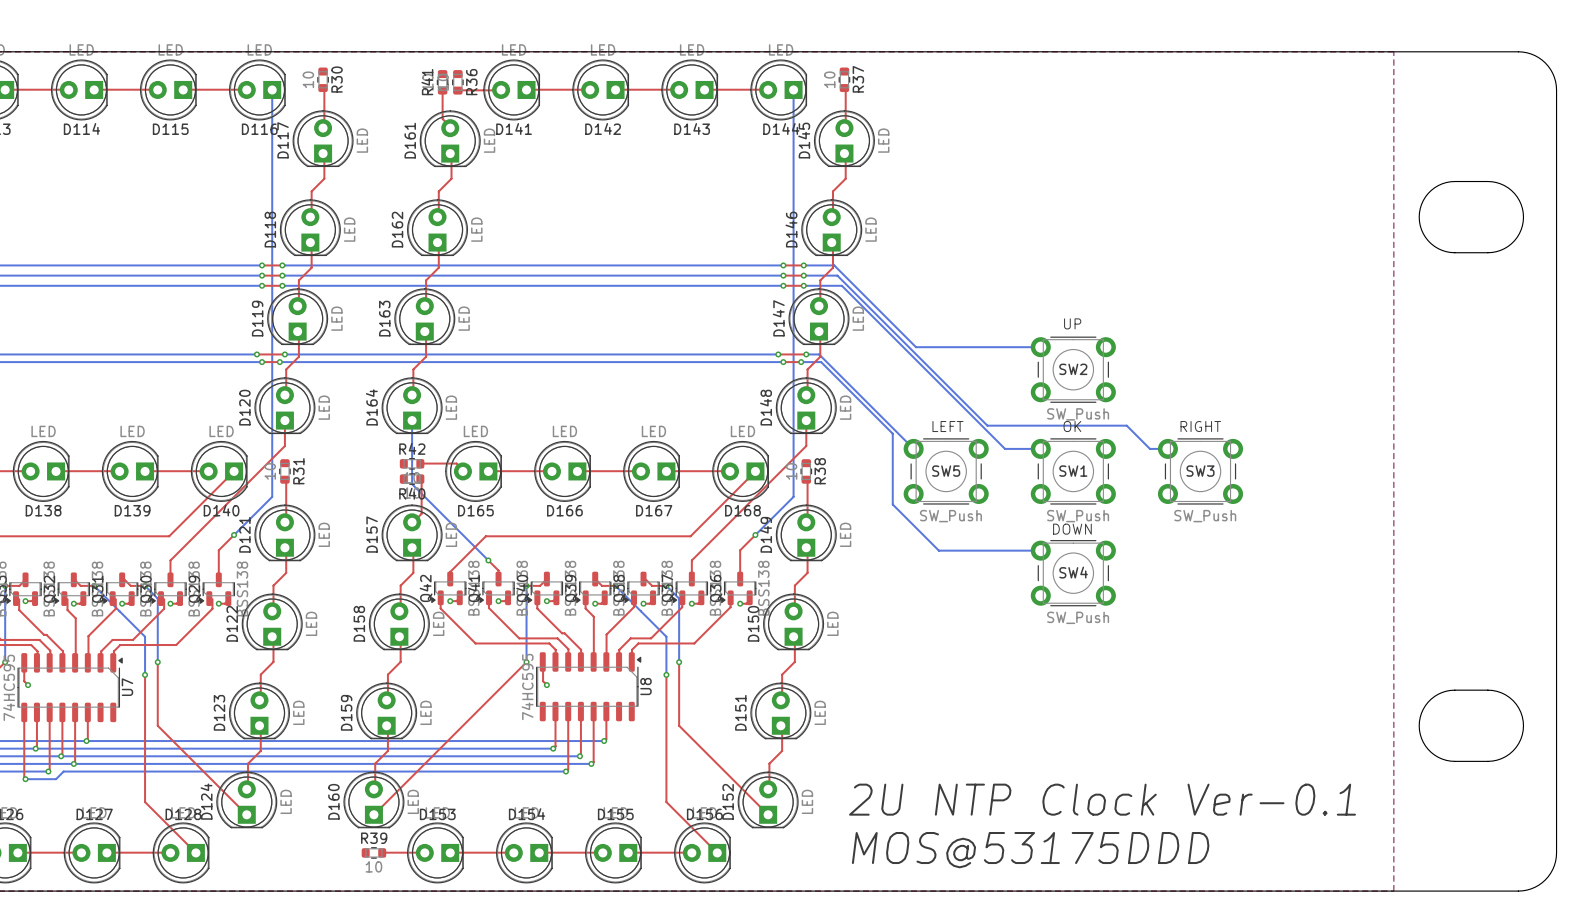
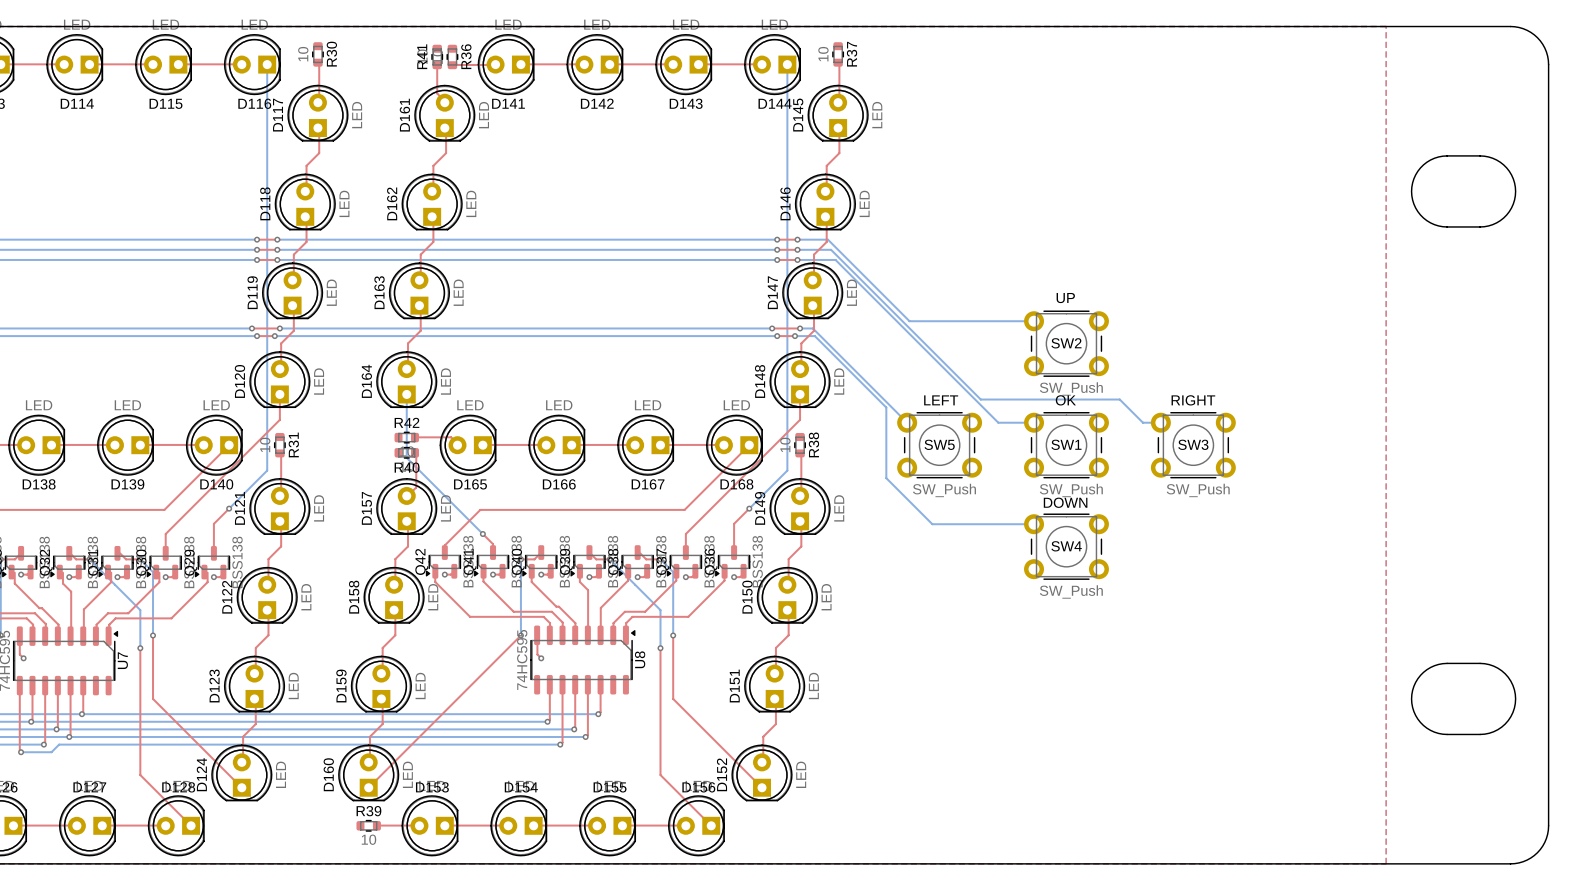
text: 2U NTP Clock Ver-0.1 (1102, 799) -> none
text: MOS@53175DDD (1030, 850) -> none

